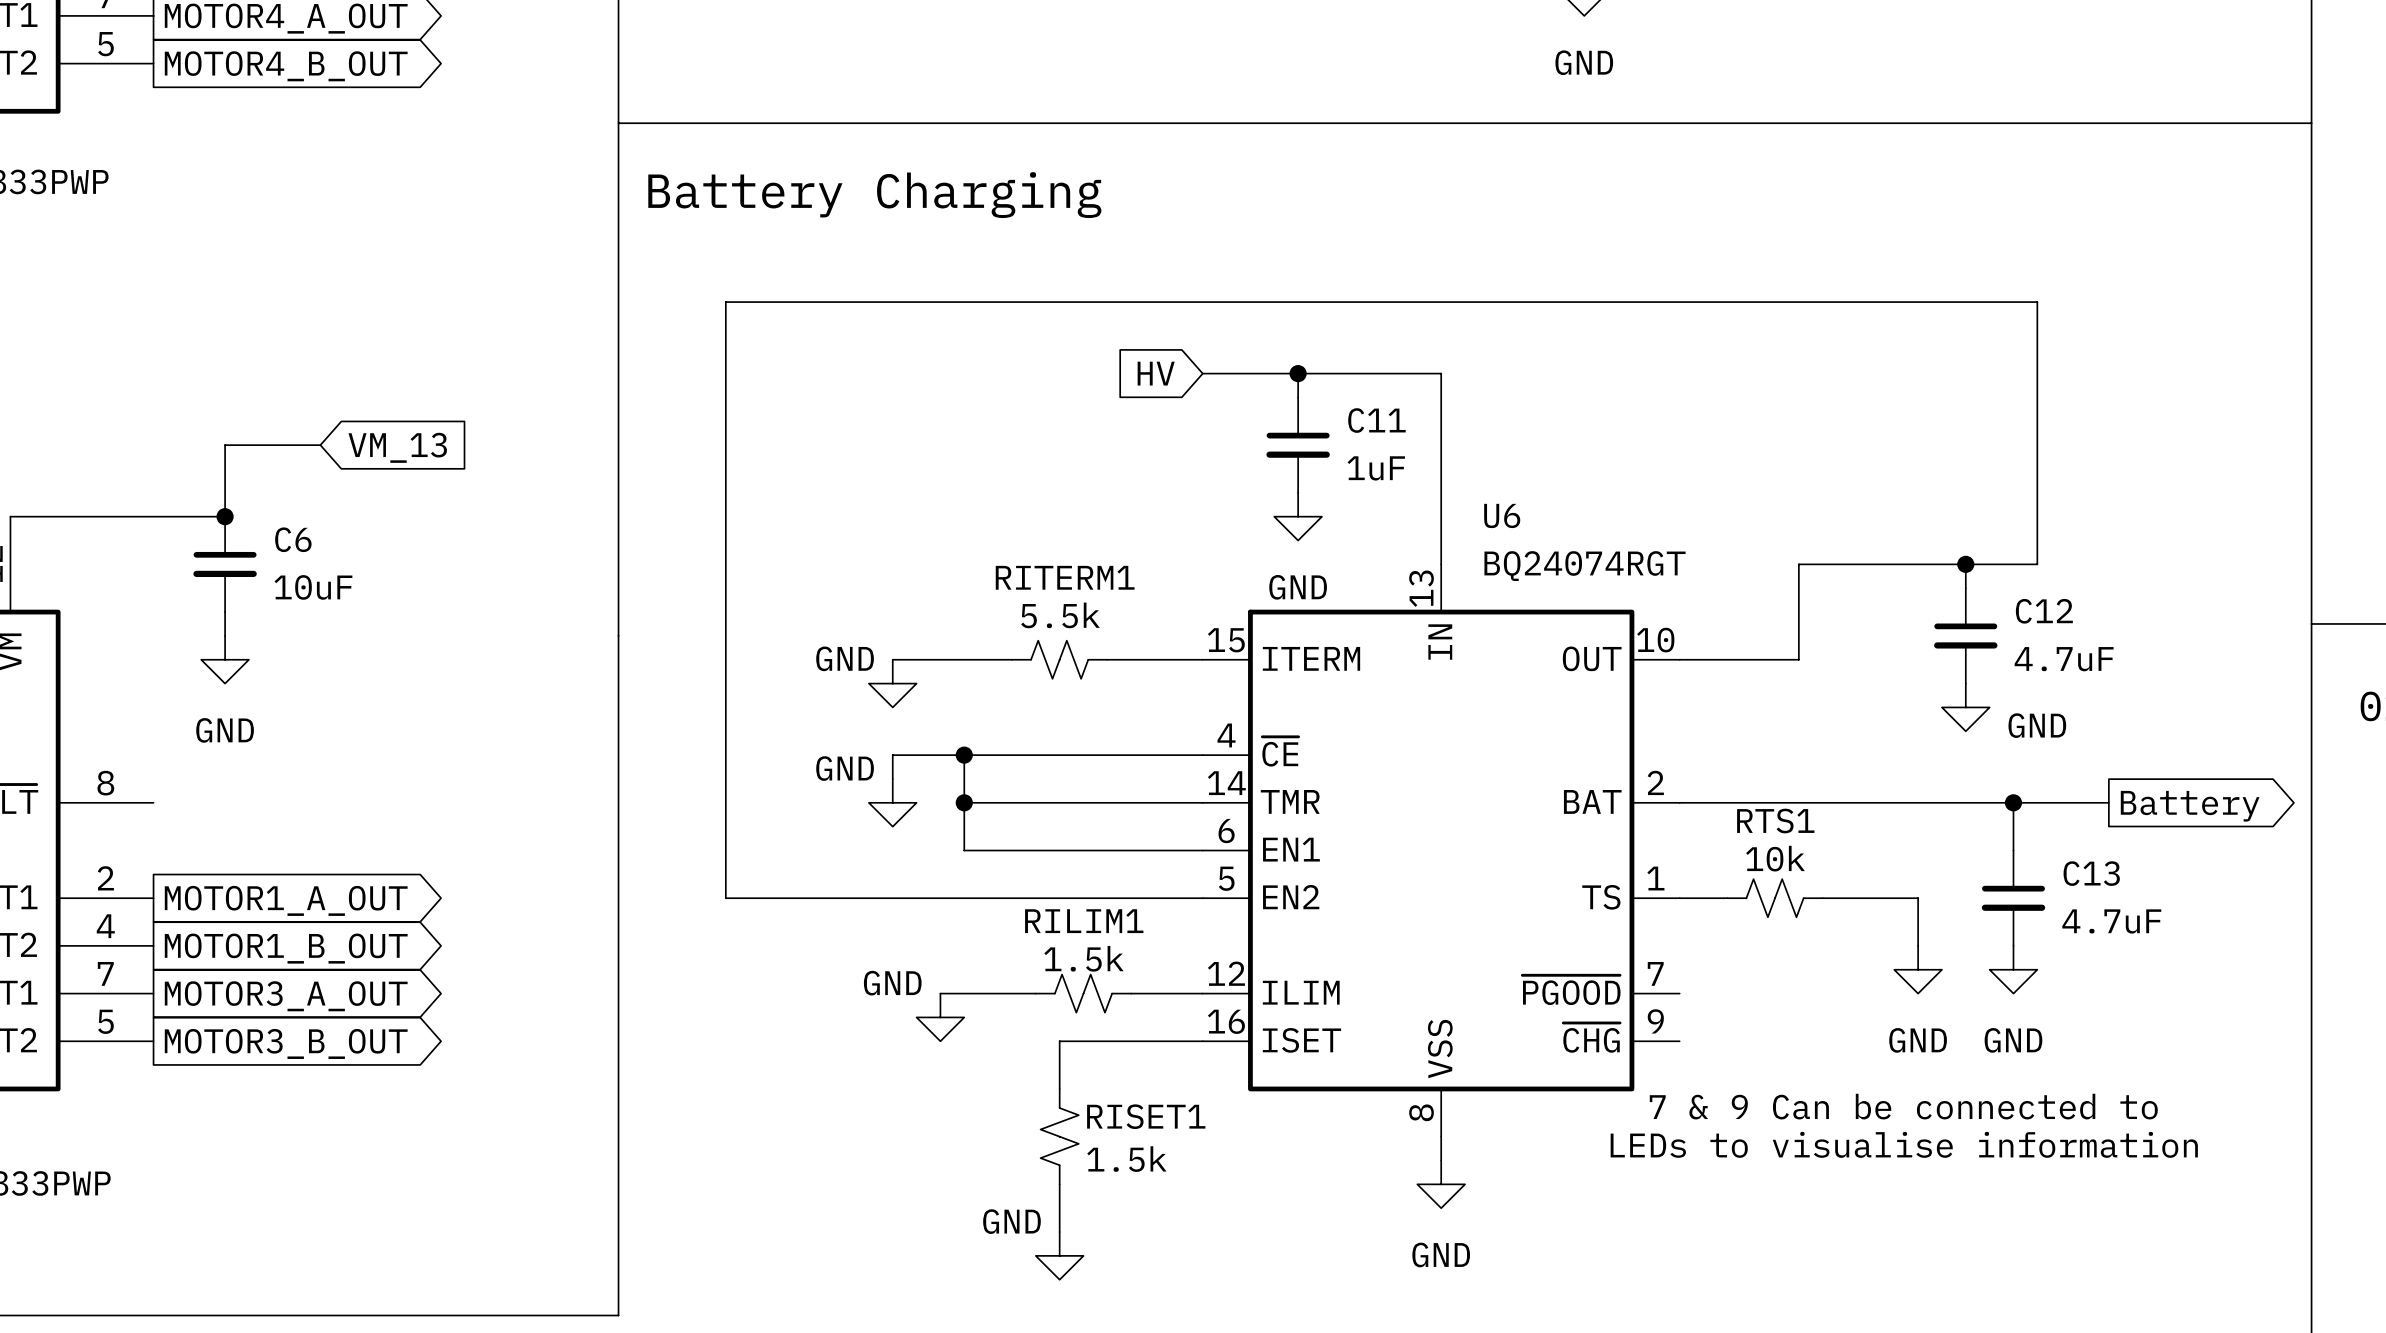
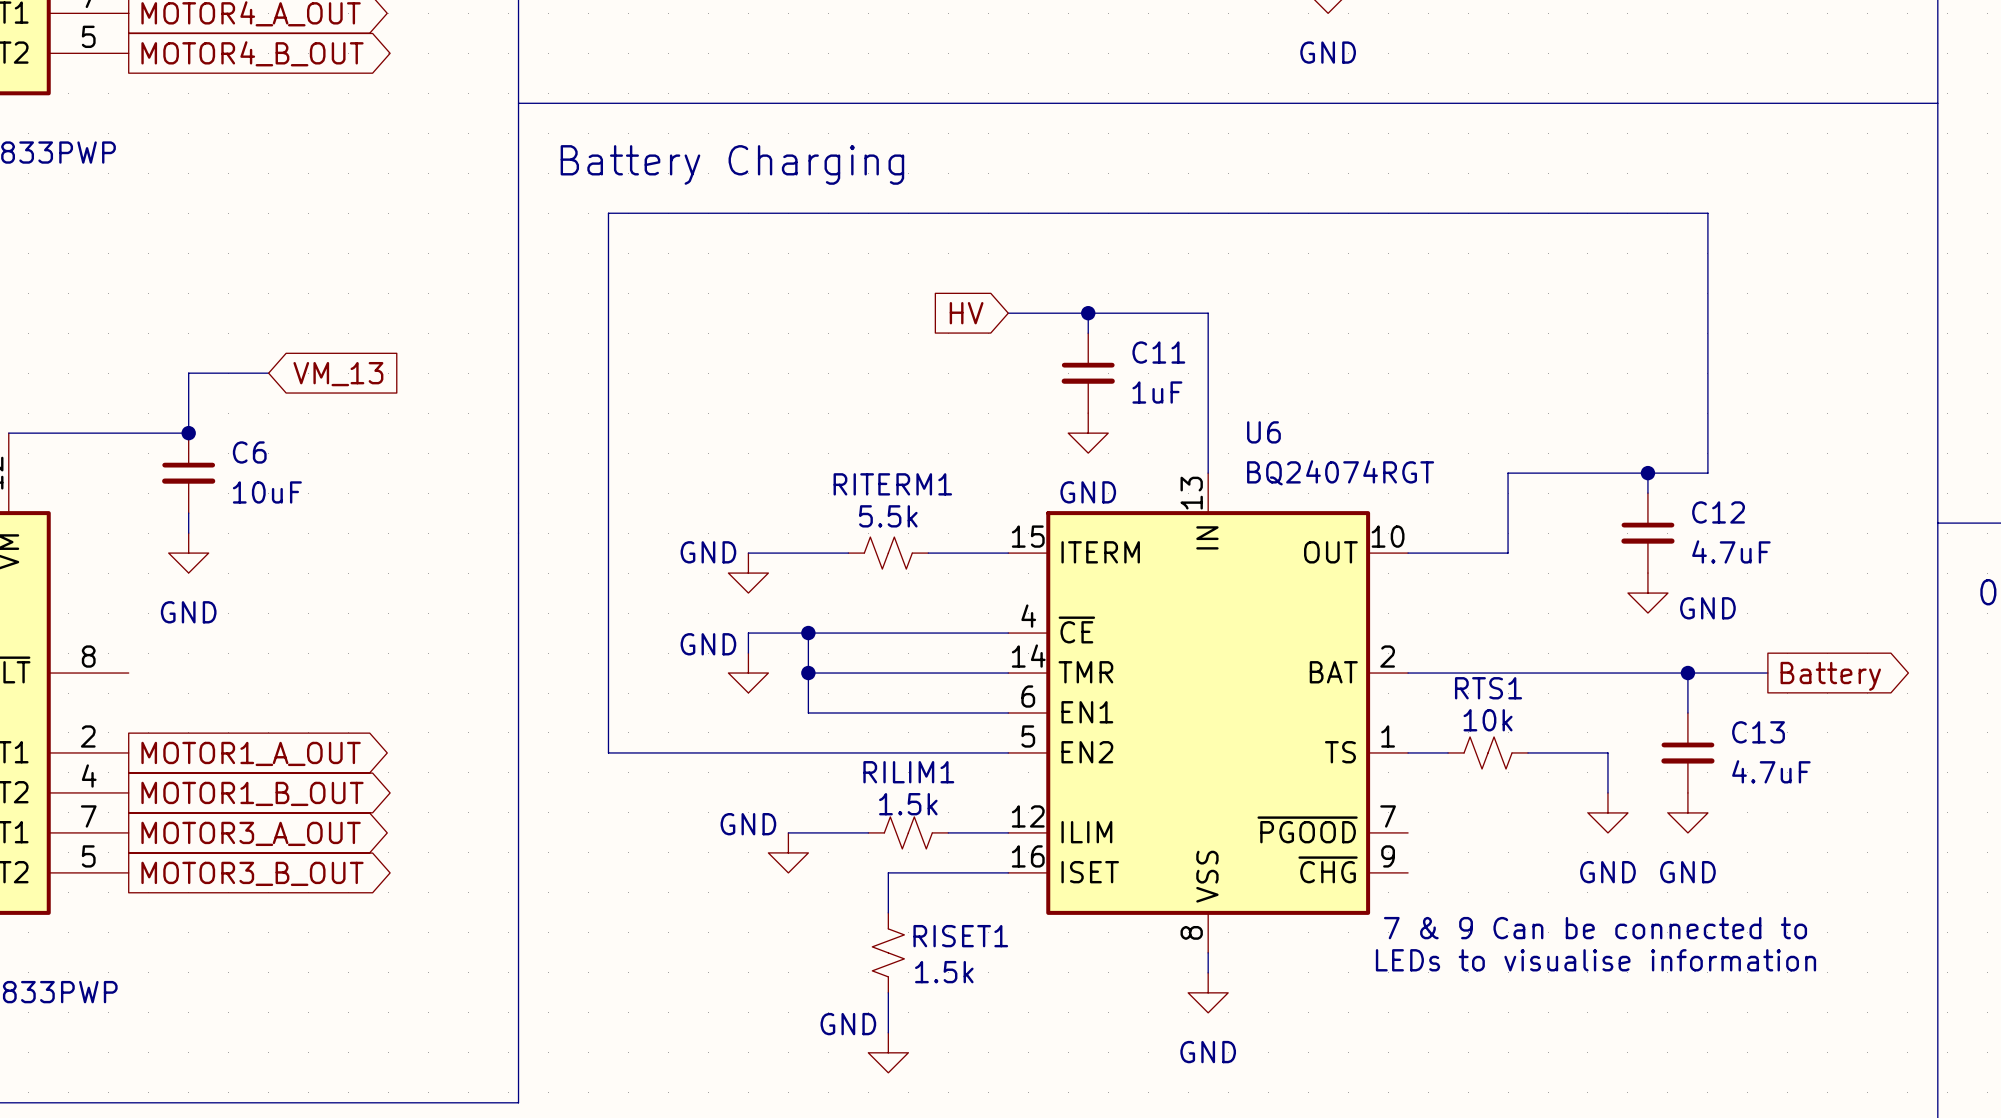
wire: (725, 302) (2037, 302) -> (608, 253) (608, 213) (1707, 213) (1707, 253)

